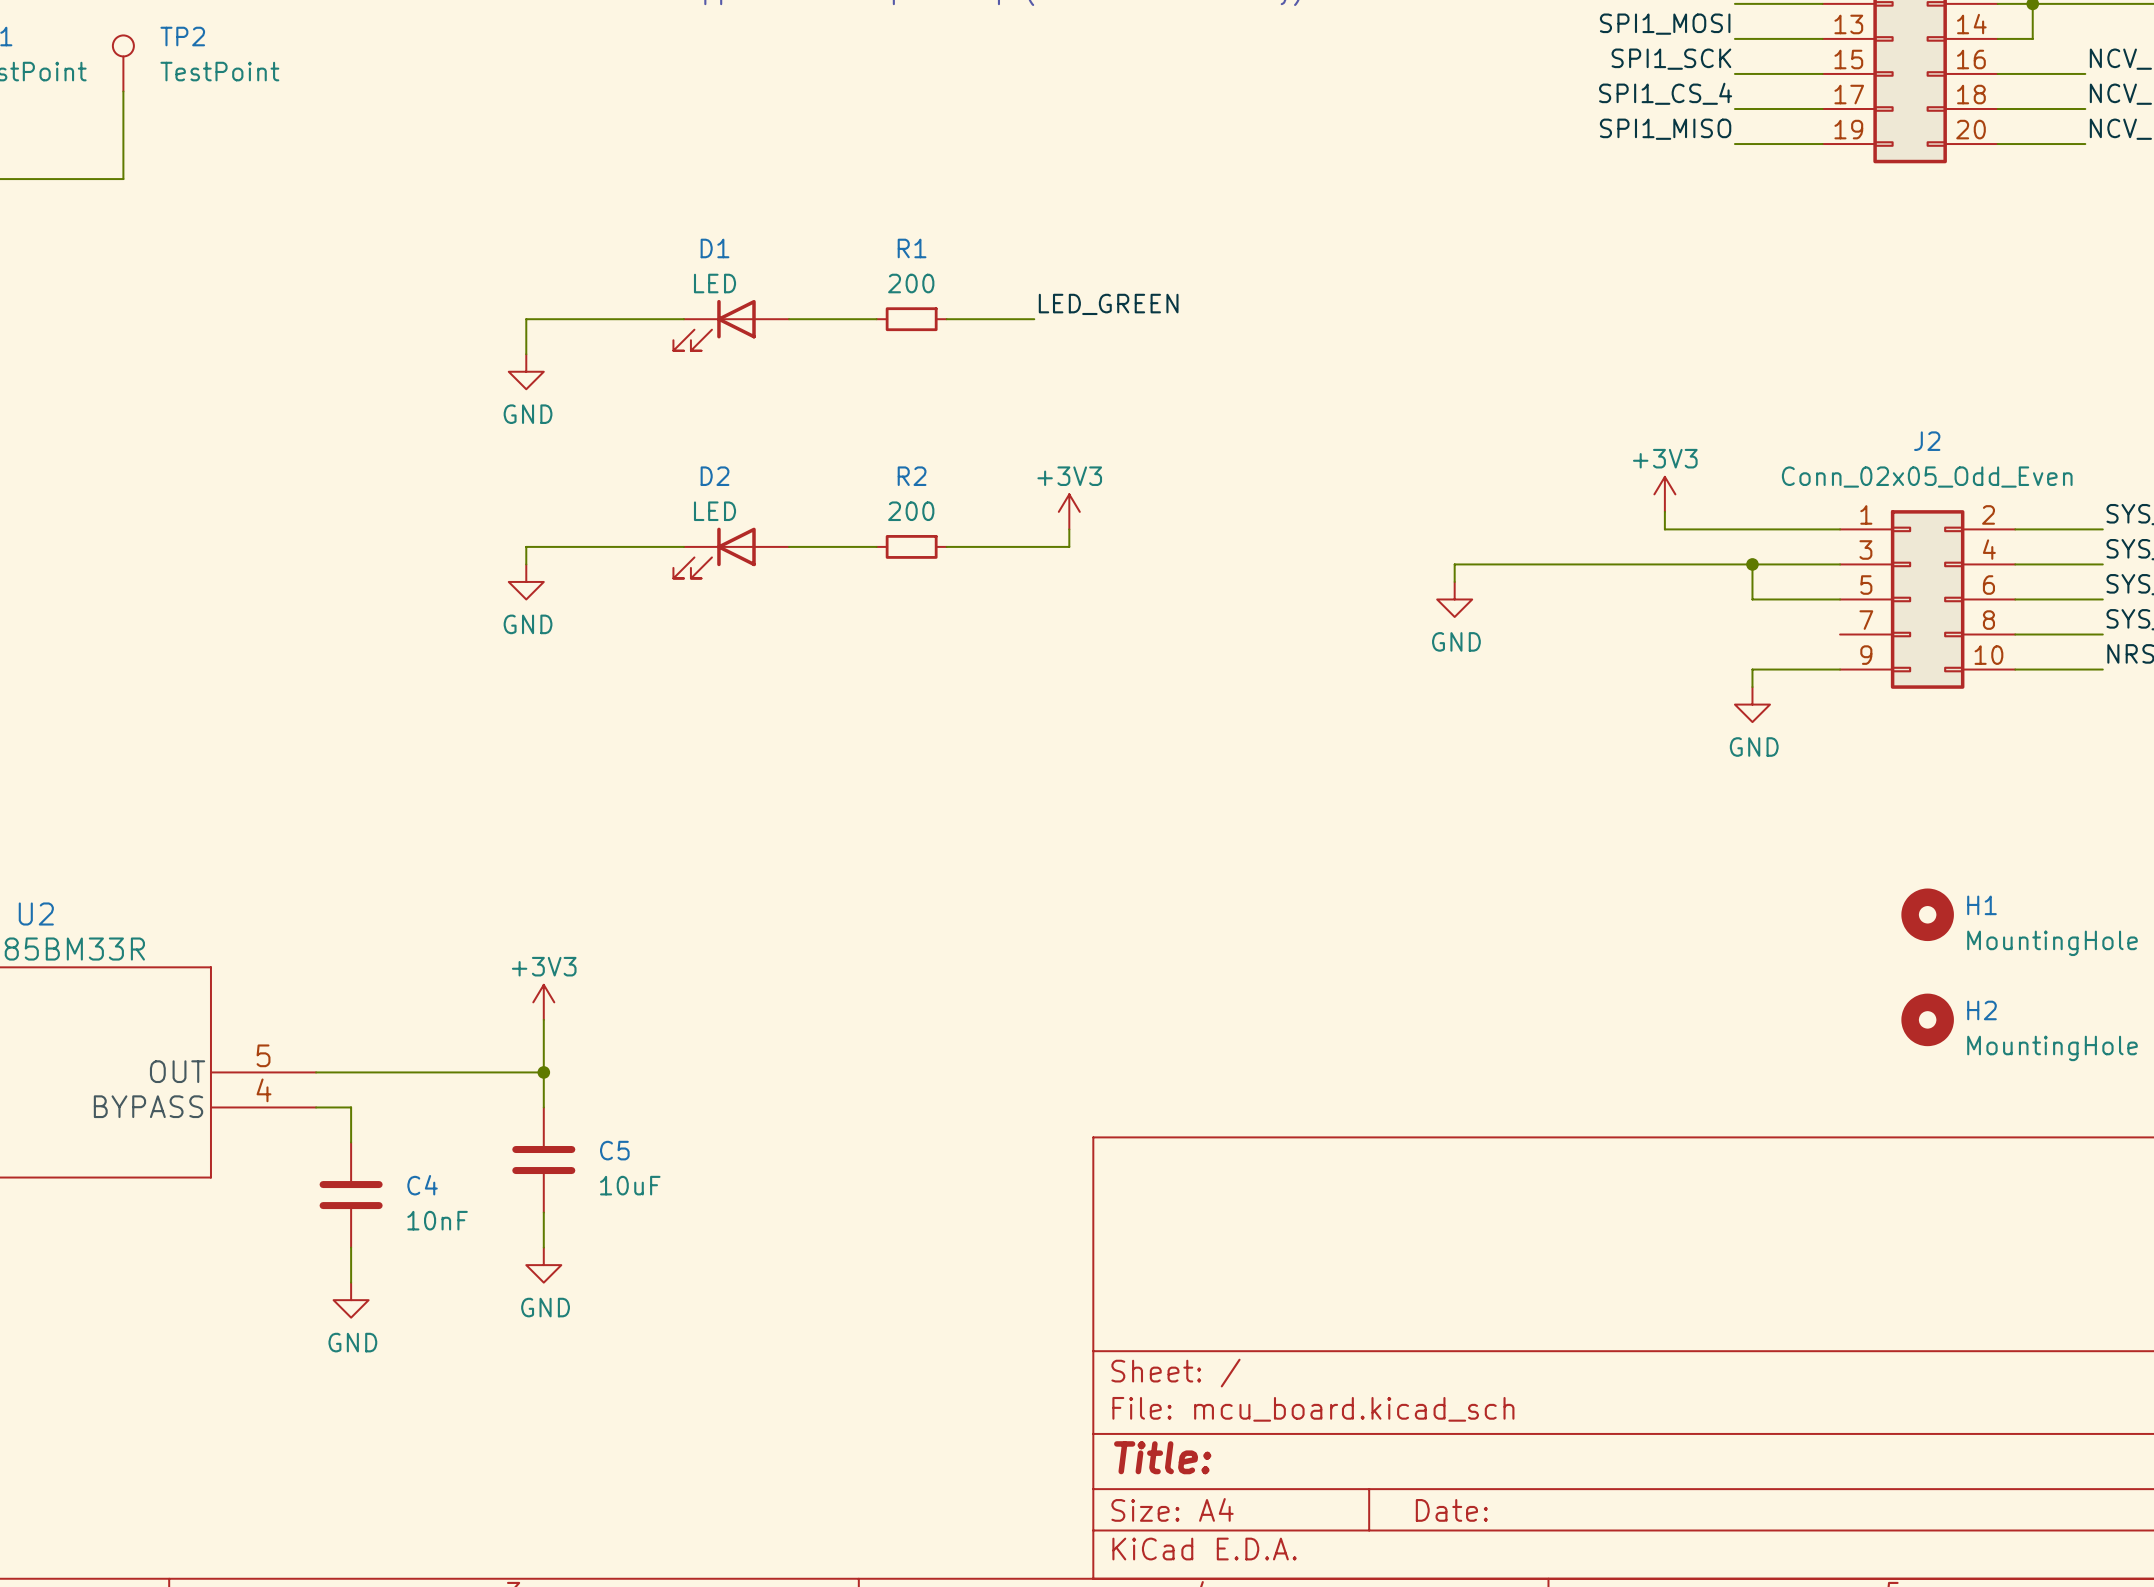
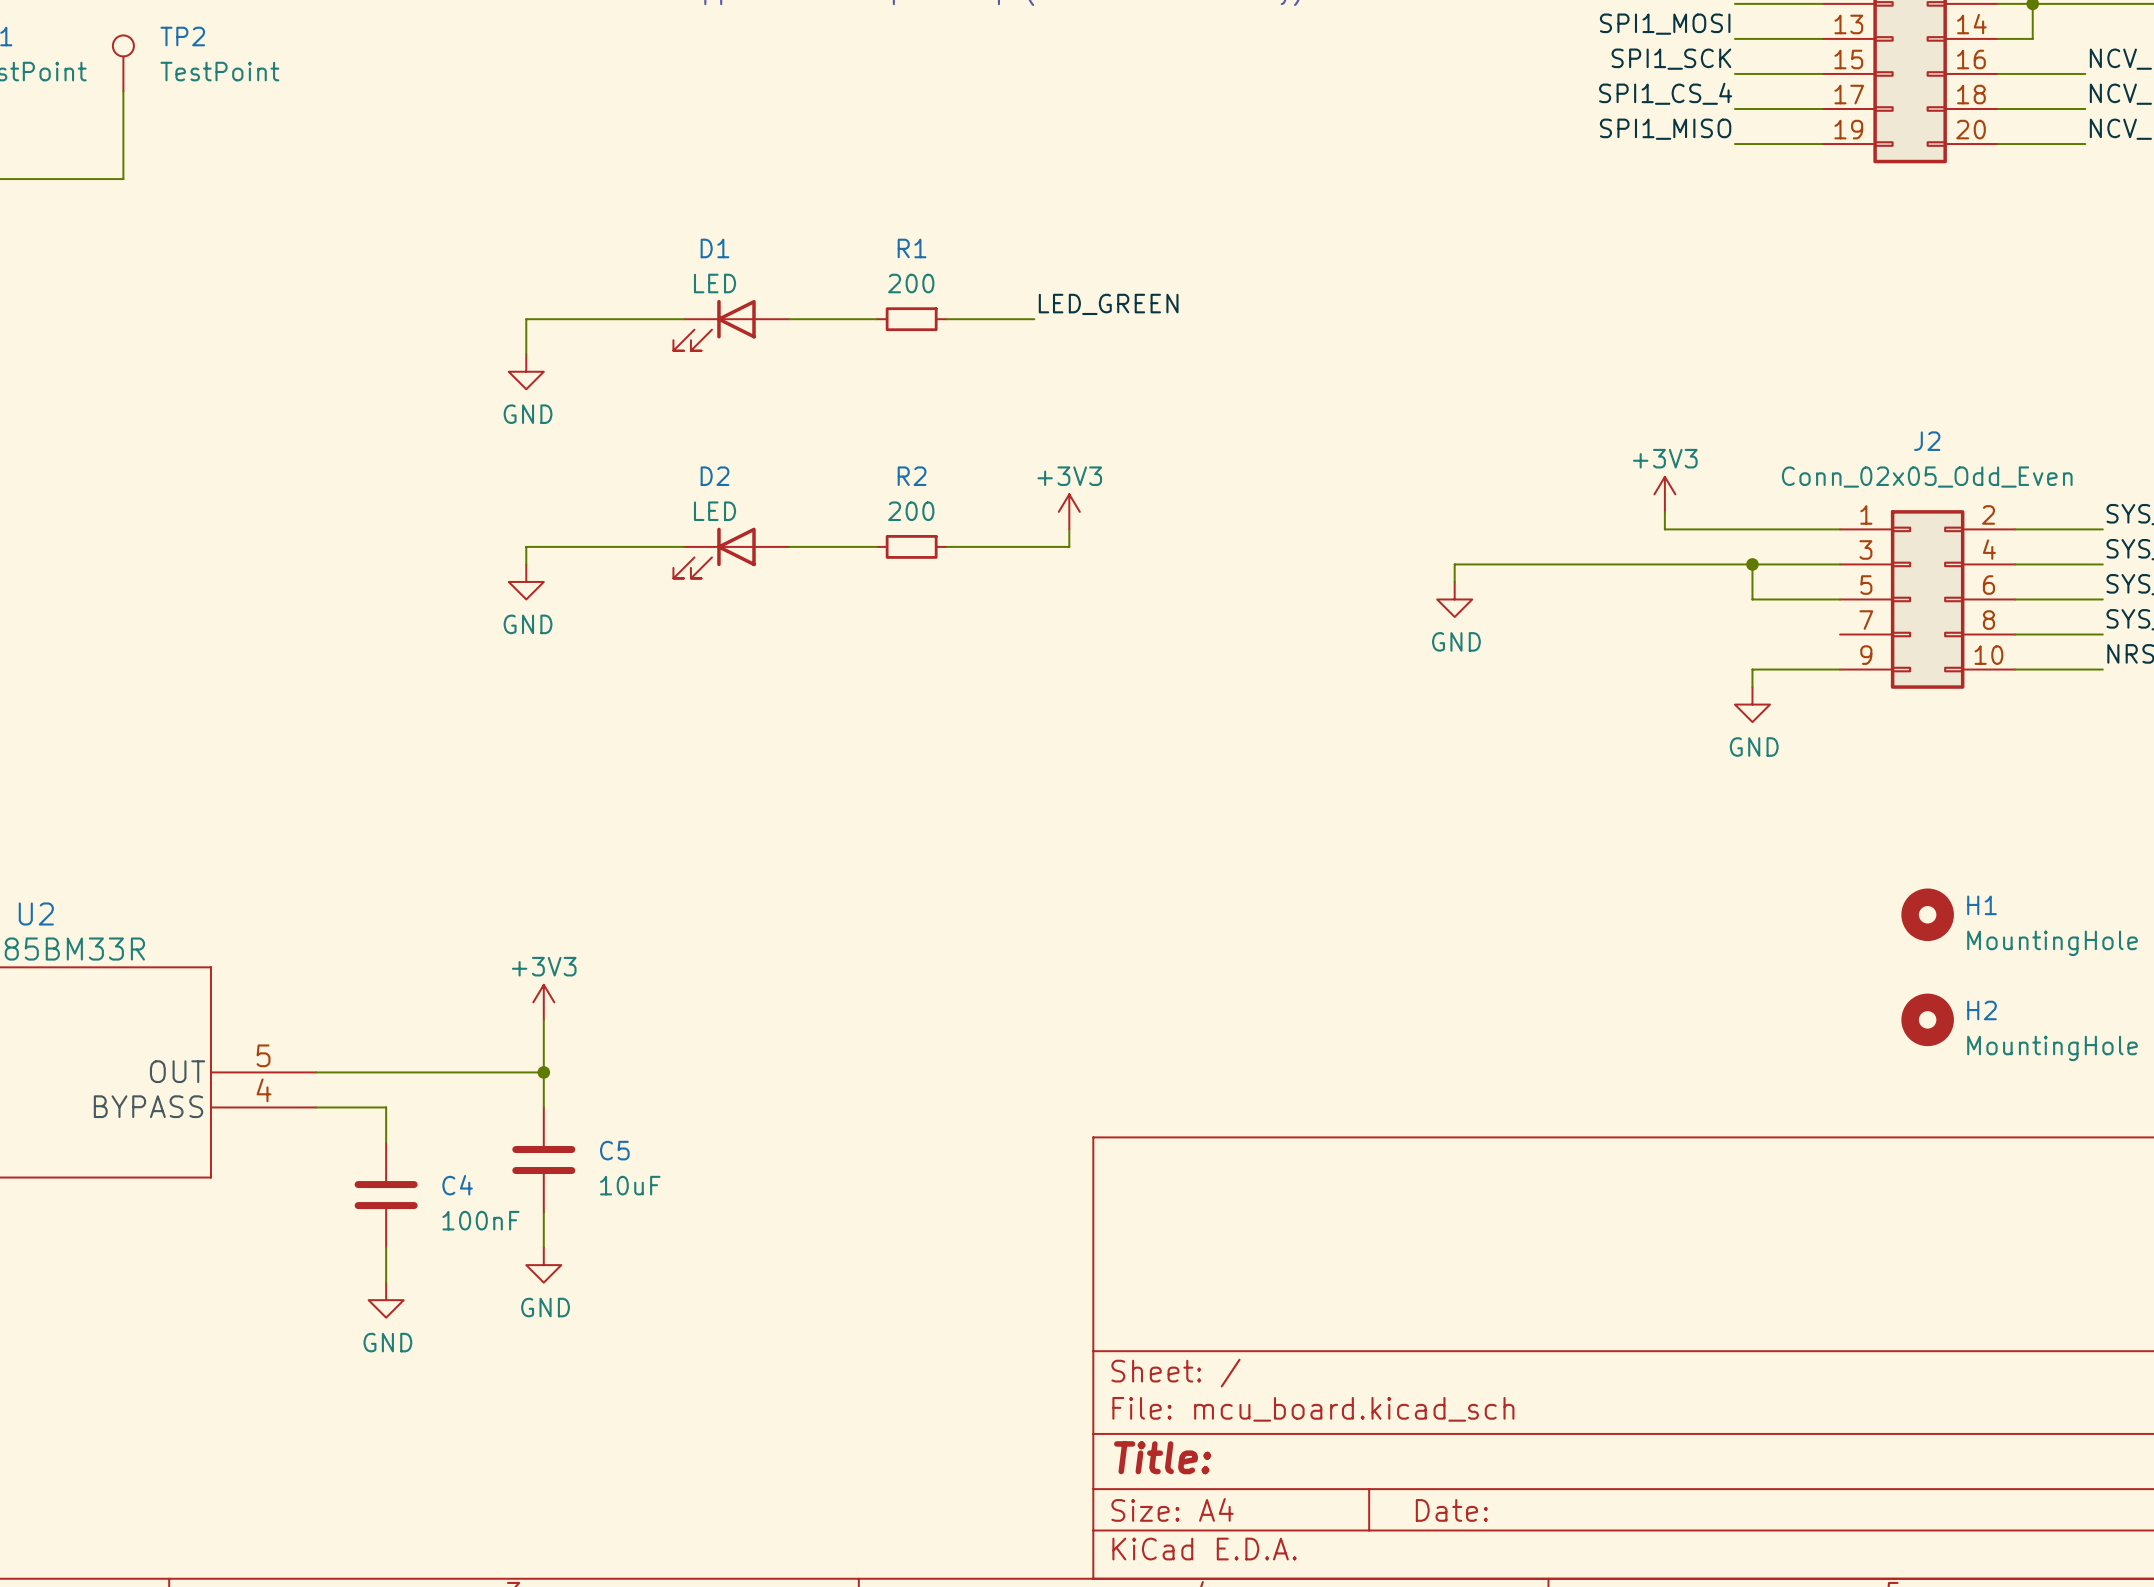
wire: (351, 1107) (351, 1142) -> (351, 1107) (386, 1107) (386, 1142)
C4 position: (351, 1195) -> (386, 1195)
C4 value: 10nF (437, 1220) -> 100nF (480, 1220)
wire: (351, 1247) (351, 1282) -> (386, 1247) (386, 1282)
power symbol position: GND (351, 1300) -> GND (386, 1300)

